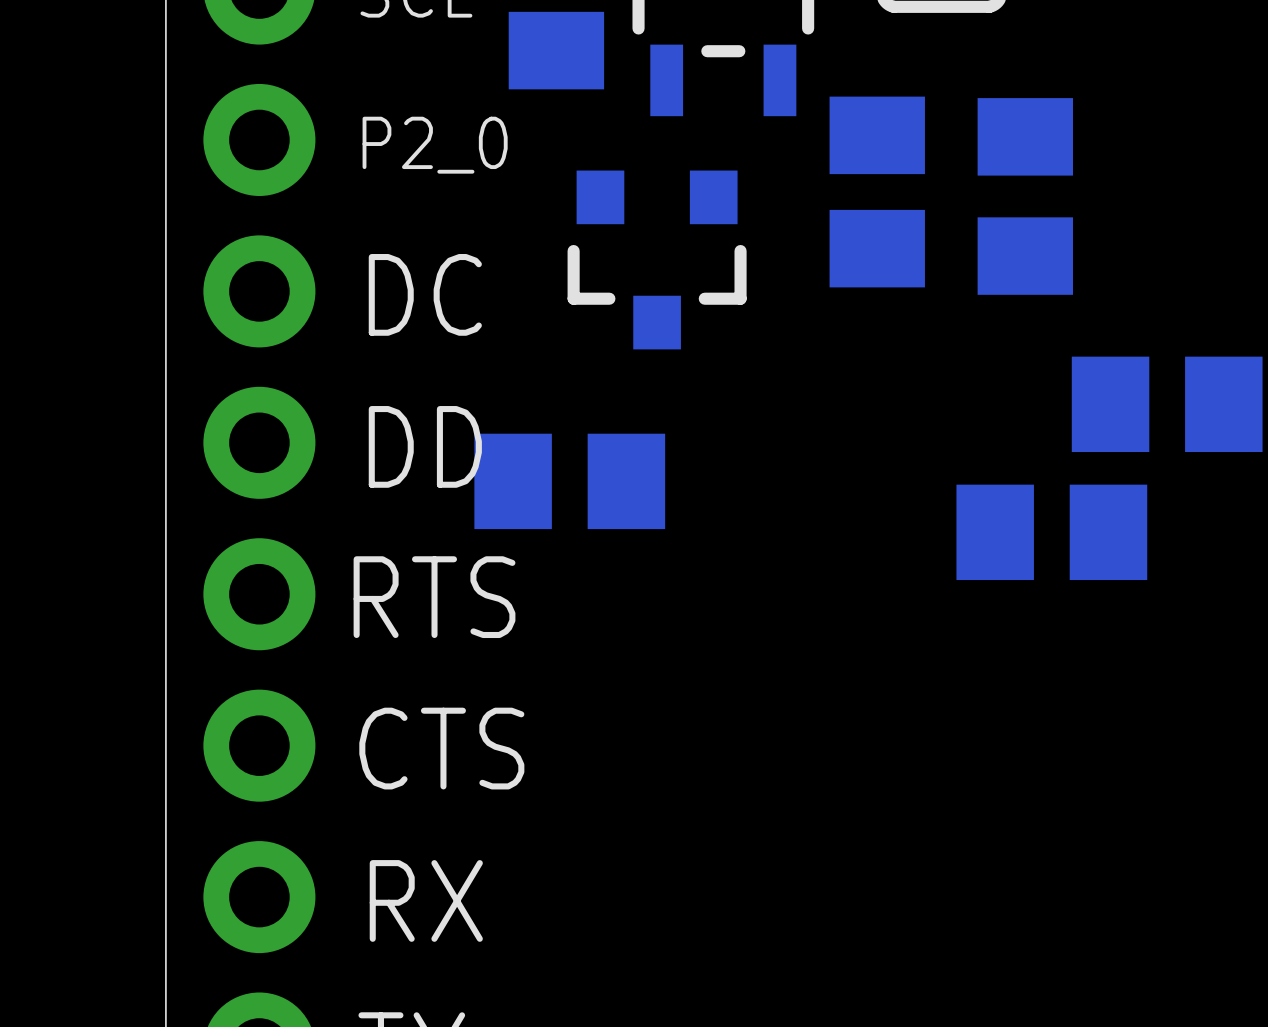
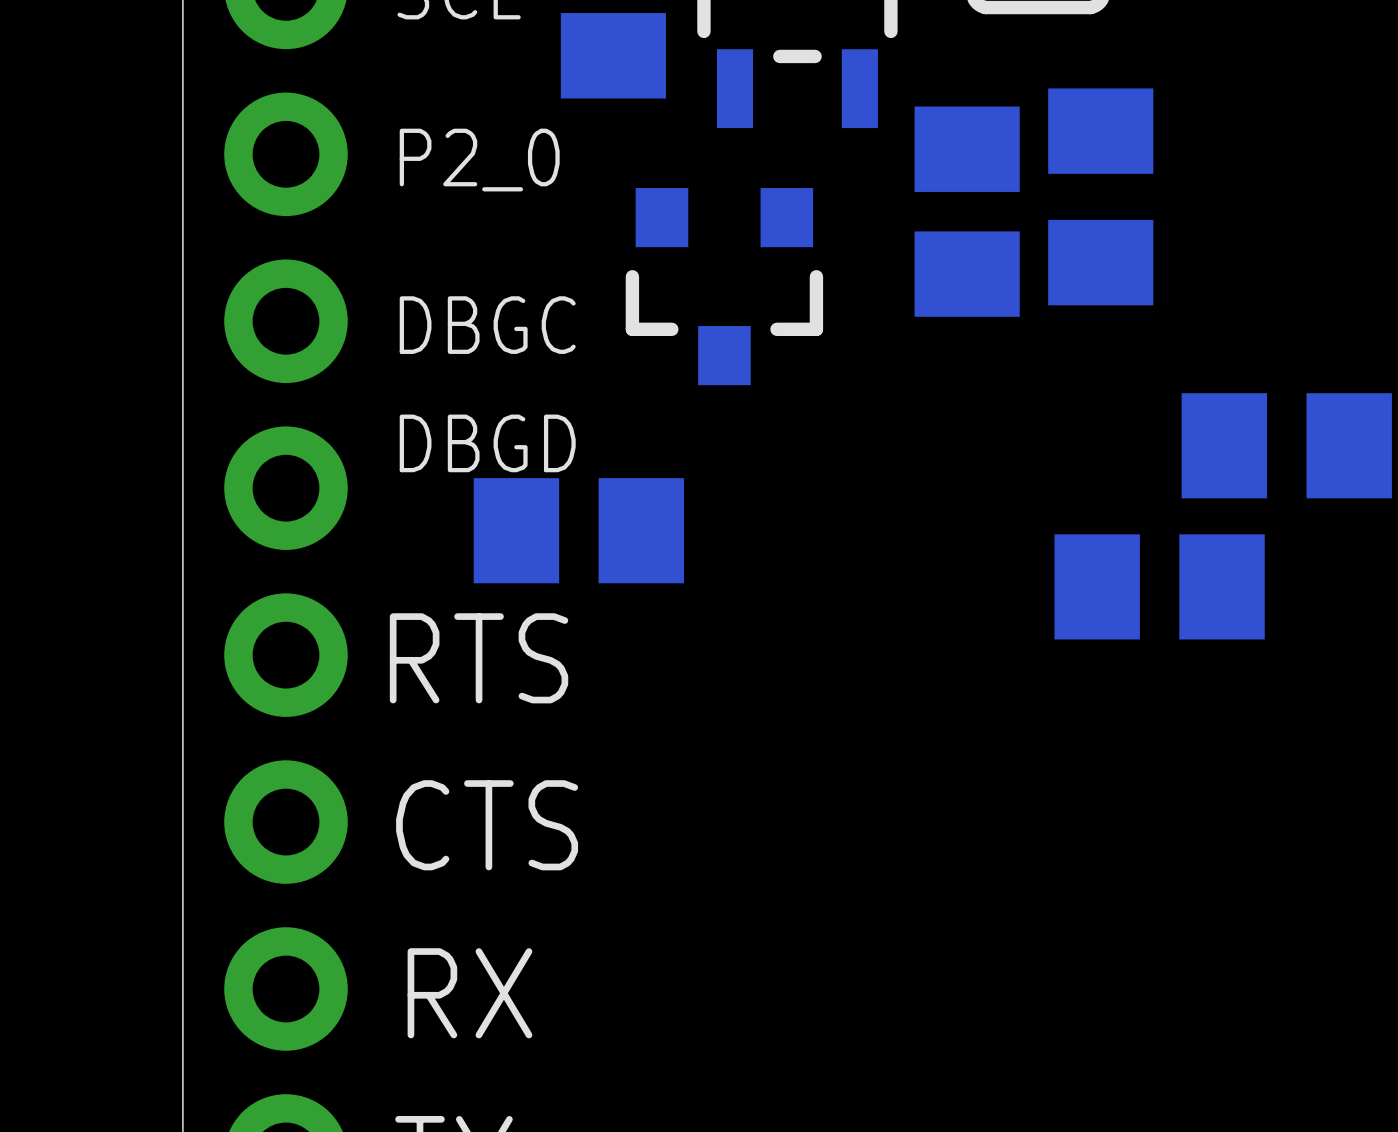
part position: (1025, 196) -> (1100, 196)
text: DC (425, 294) -> DBGC (487, 325)
text: DD (425, 446) -> DBGD (487, 443)
part position: (569, 481) -> (578, 530)

